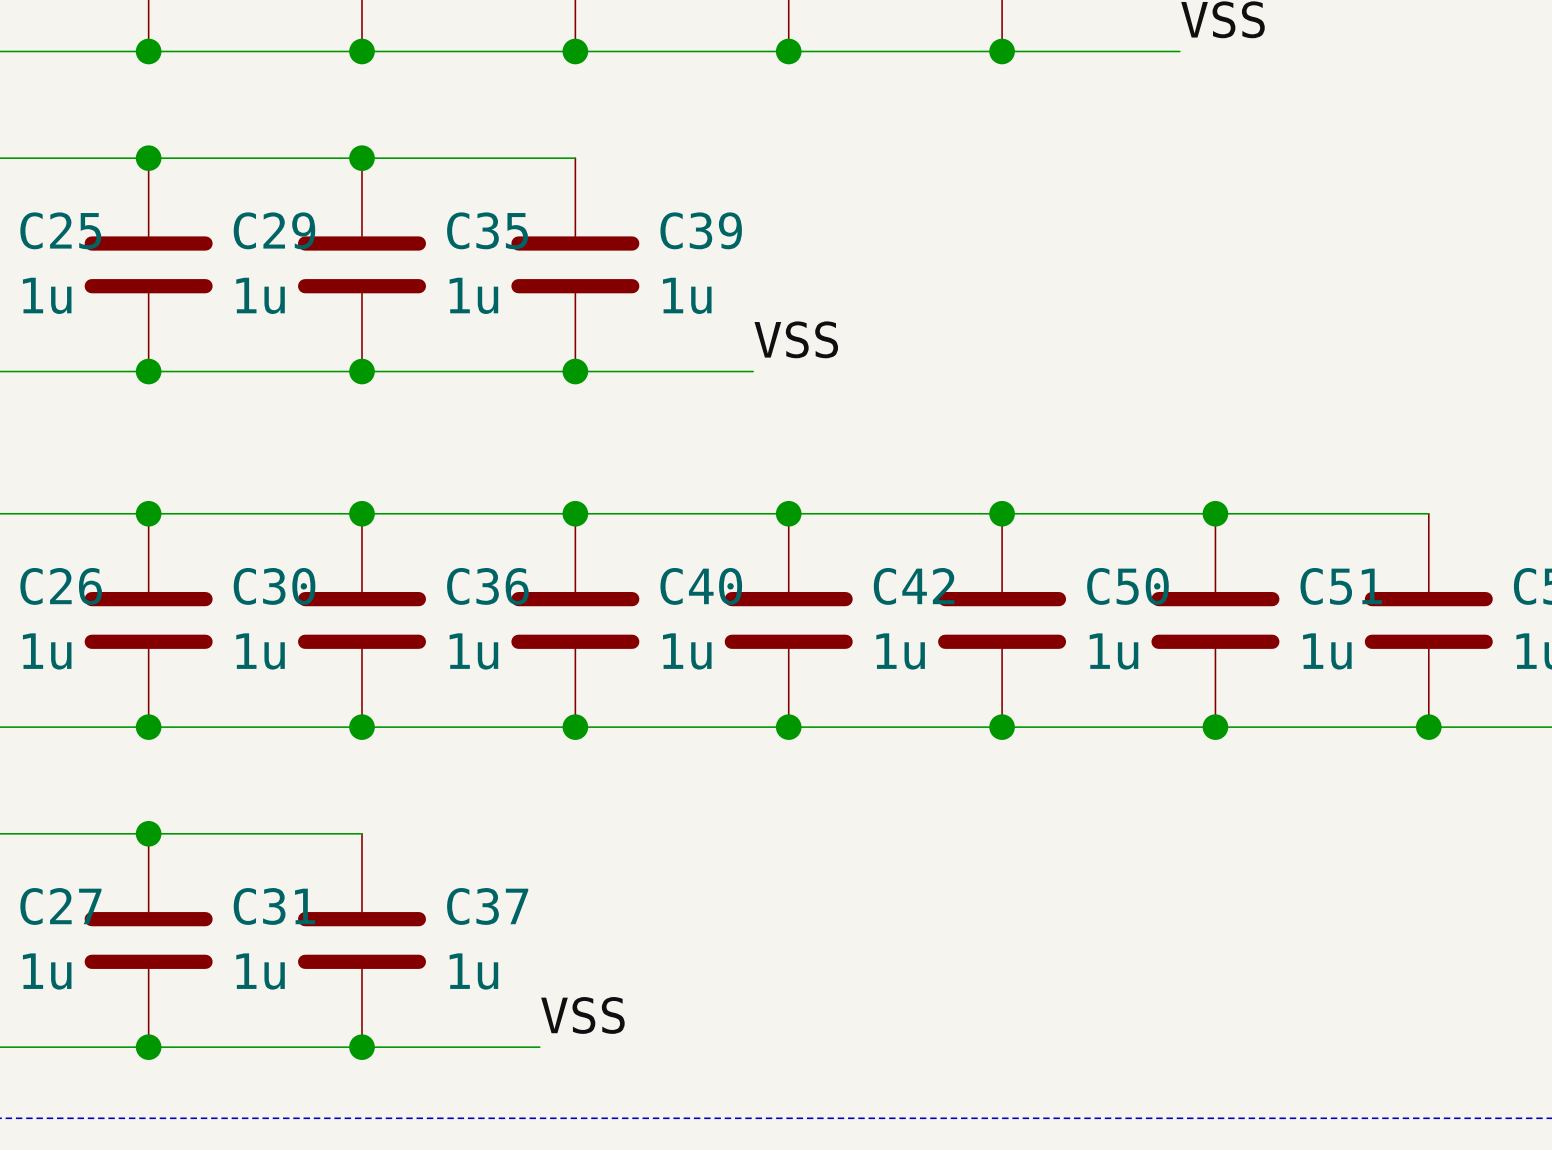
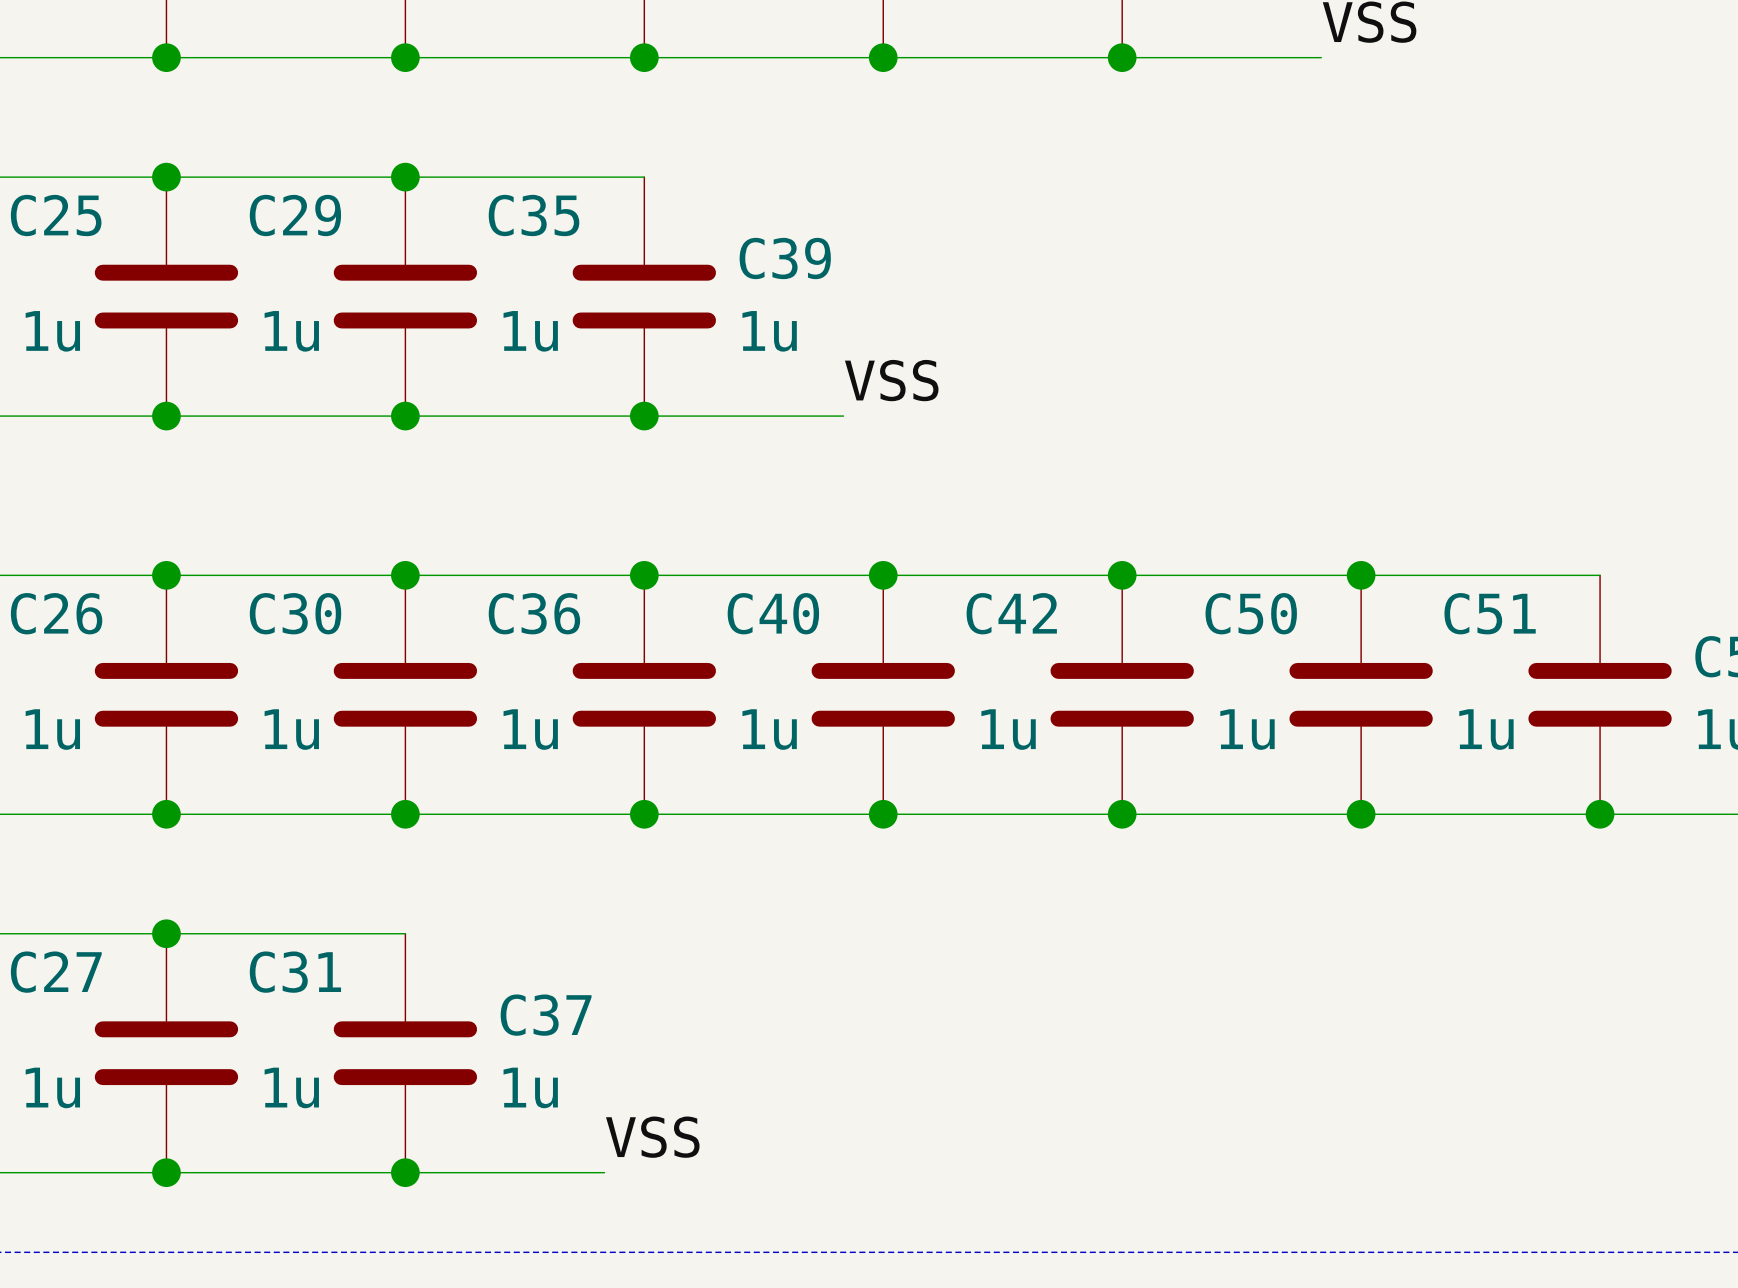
C25 name position: C25 (60, 230) -> C25 (56, 215)
C29 name position: C29 (274, 230) -> C29 (295, 215)
C35 name position: C35 (487, 230) -> C35 (534, 215)
C26 name position: C26 (61, 586) -> C26 (56, 613)
C30 name position: C30 (274, 586) -> C30 (295, 613)
C36 name position: C36 (487, 586) -> C36 (534, 613)
C40 name position: C40 (701, 586) -> C40 (773, 613)
C42 name position: C42 (914, 586) -> C42 (1011, 613)
C50 name position: C50 (1127, 586) -> C50 (1251, 613)
C51 name position: C51 (1341, 586) -> C51 (1490, 613)
C27 name position: C27 (60, 906) -> C27 (56, 972)
C31 name position: C31 (274, 906) -> C31 (295, 972)

